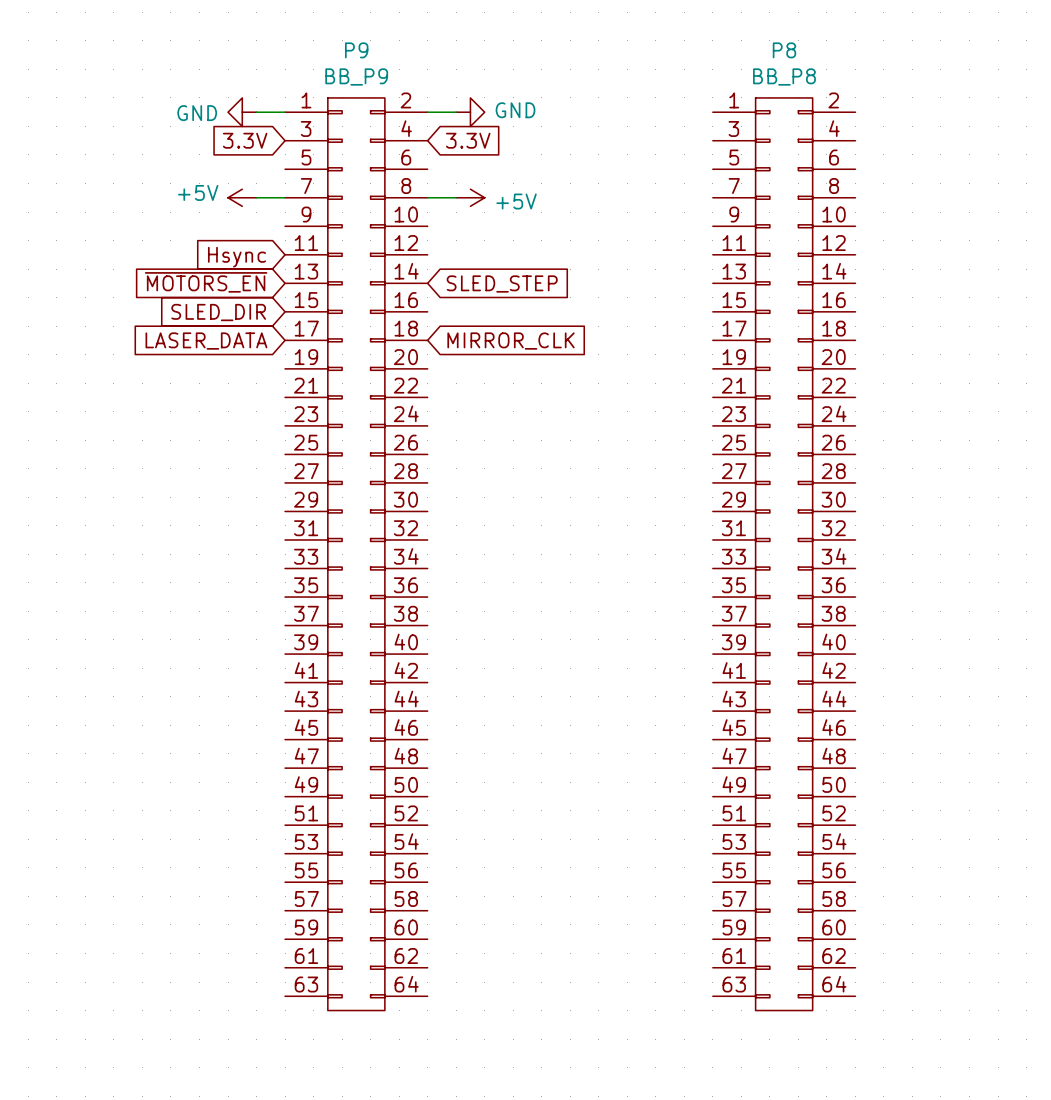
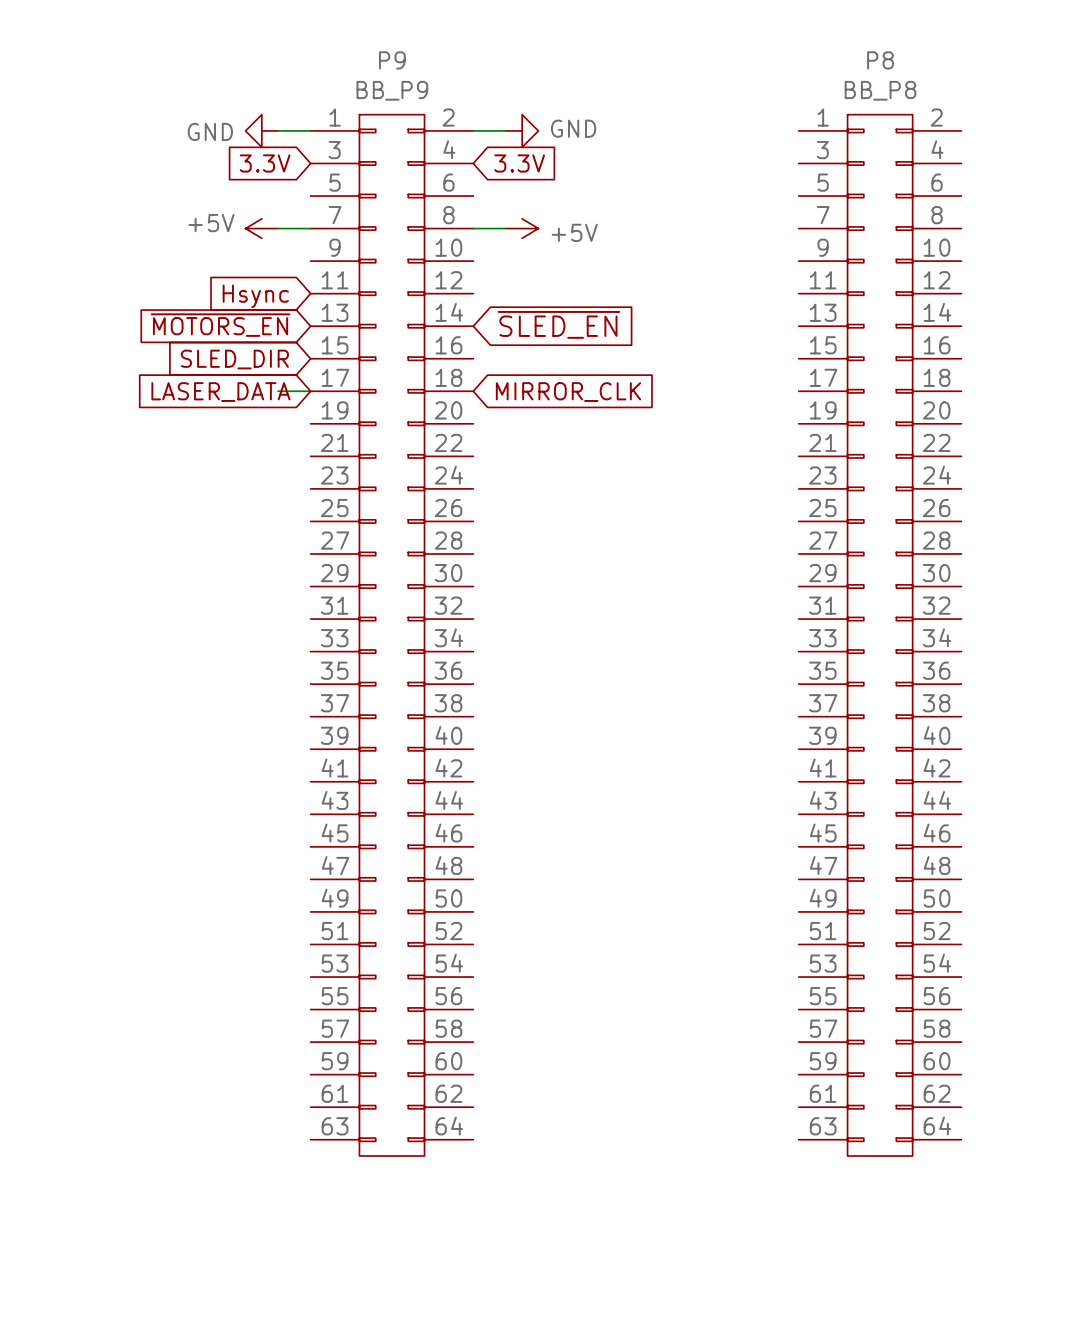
global label: SLED_STEP (502, 284) -> ~{SLED_EN} (558, 324)
wire: none -> (278, 391) (310, 391)

